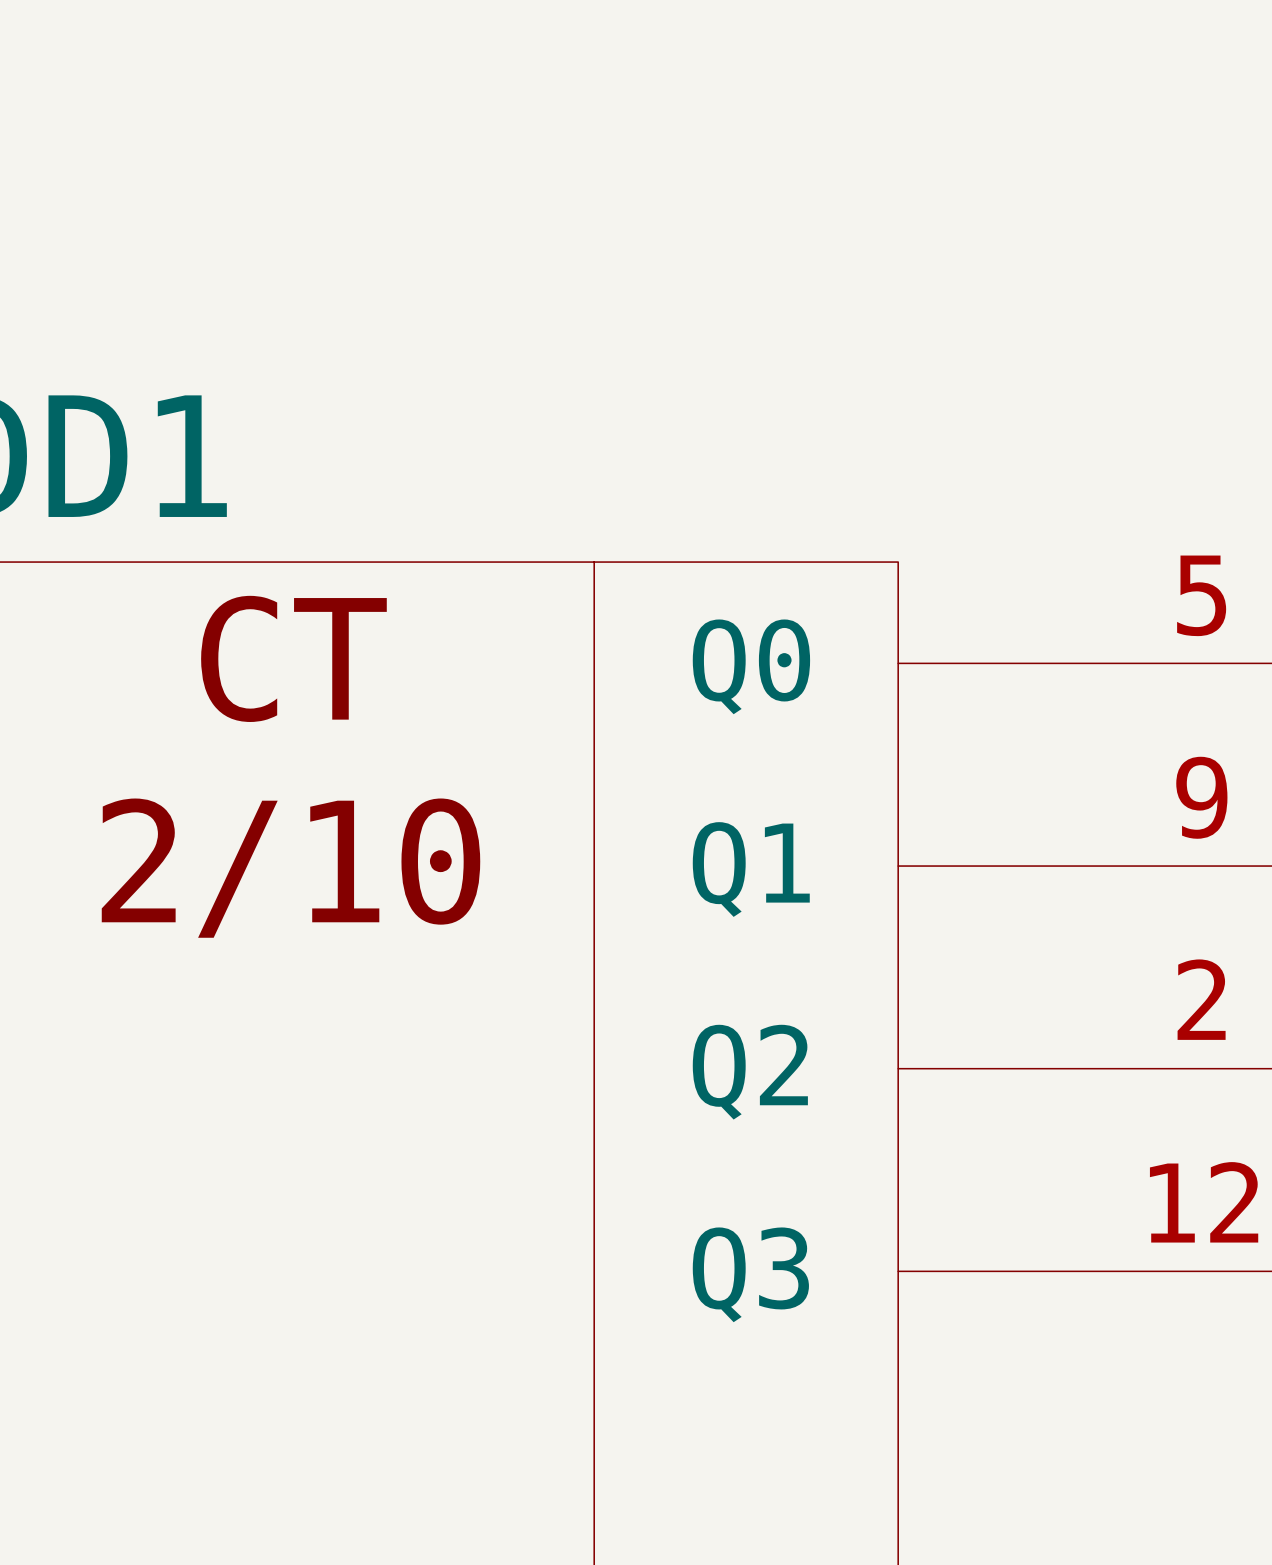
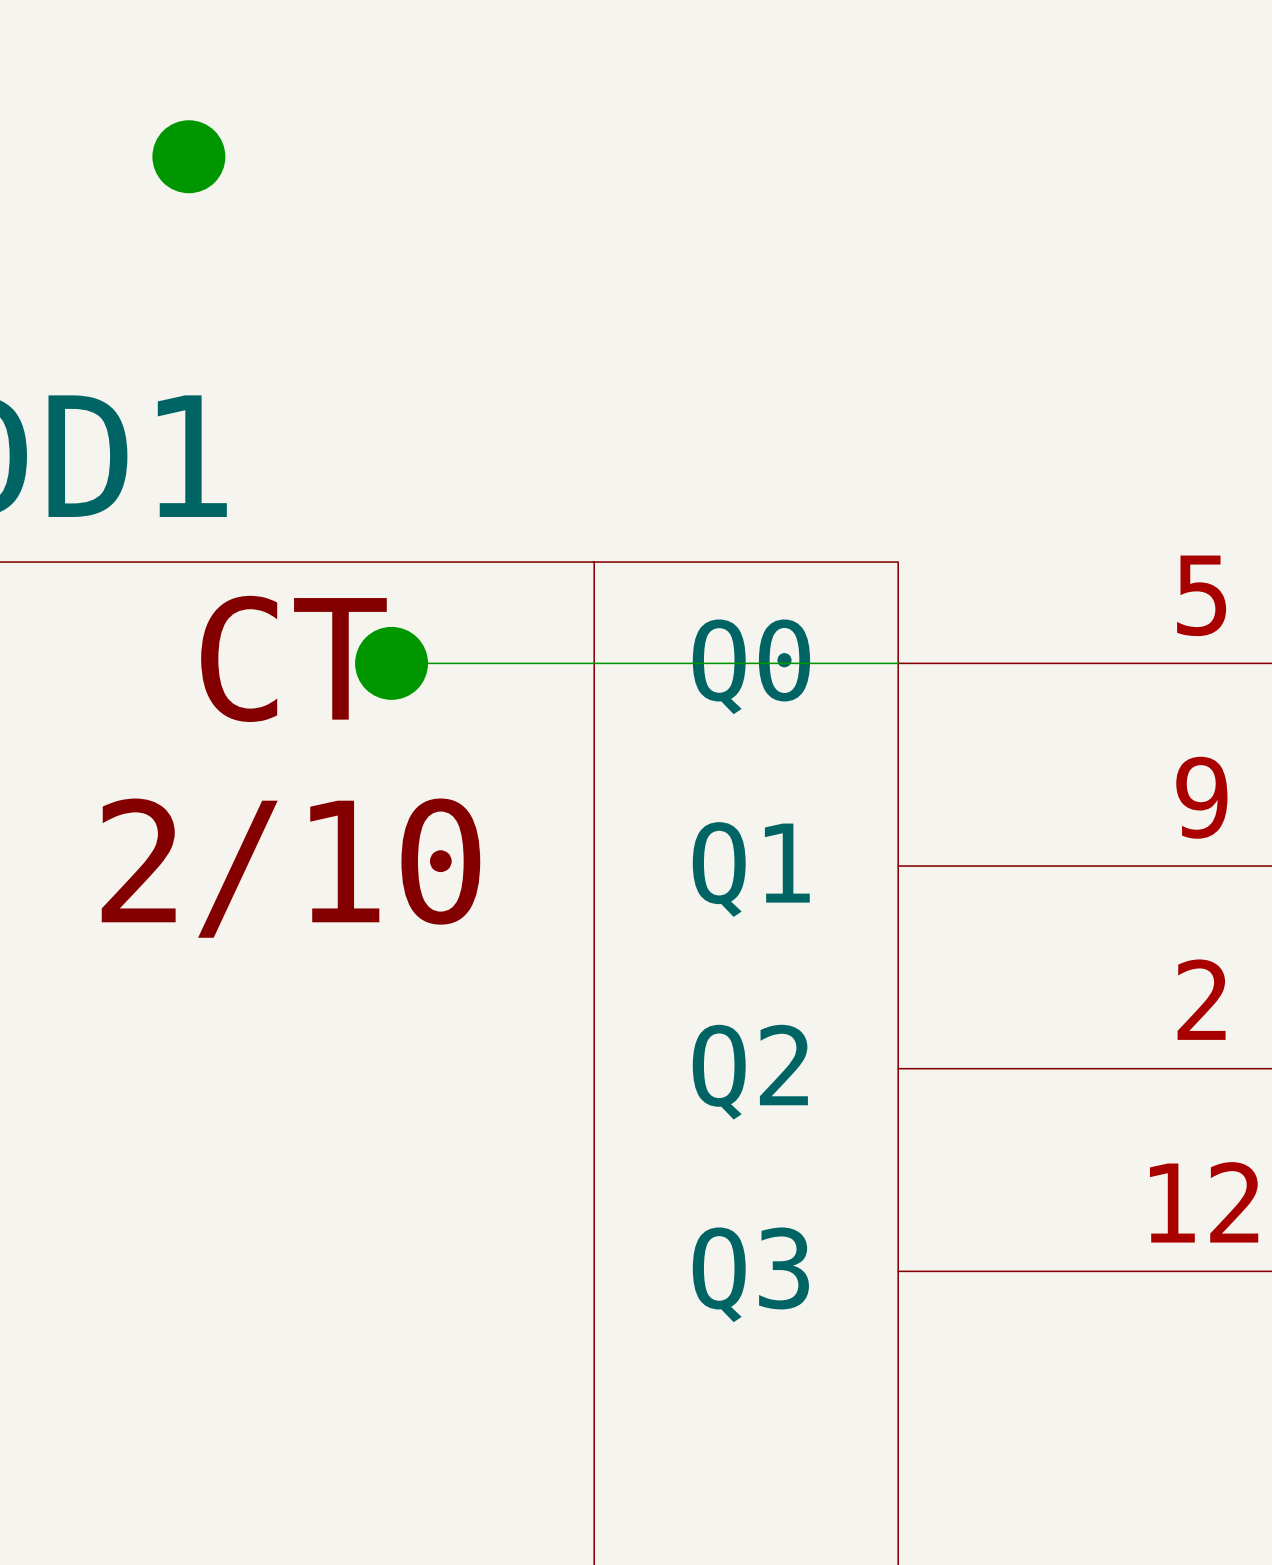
junction: none -> (188, 156)
wire: none -> (391, 663) (898, 663)
junction: none -> (391, 663)

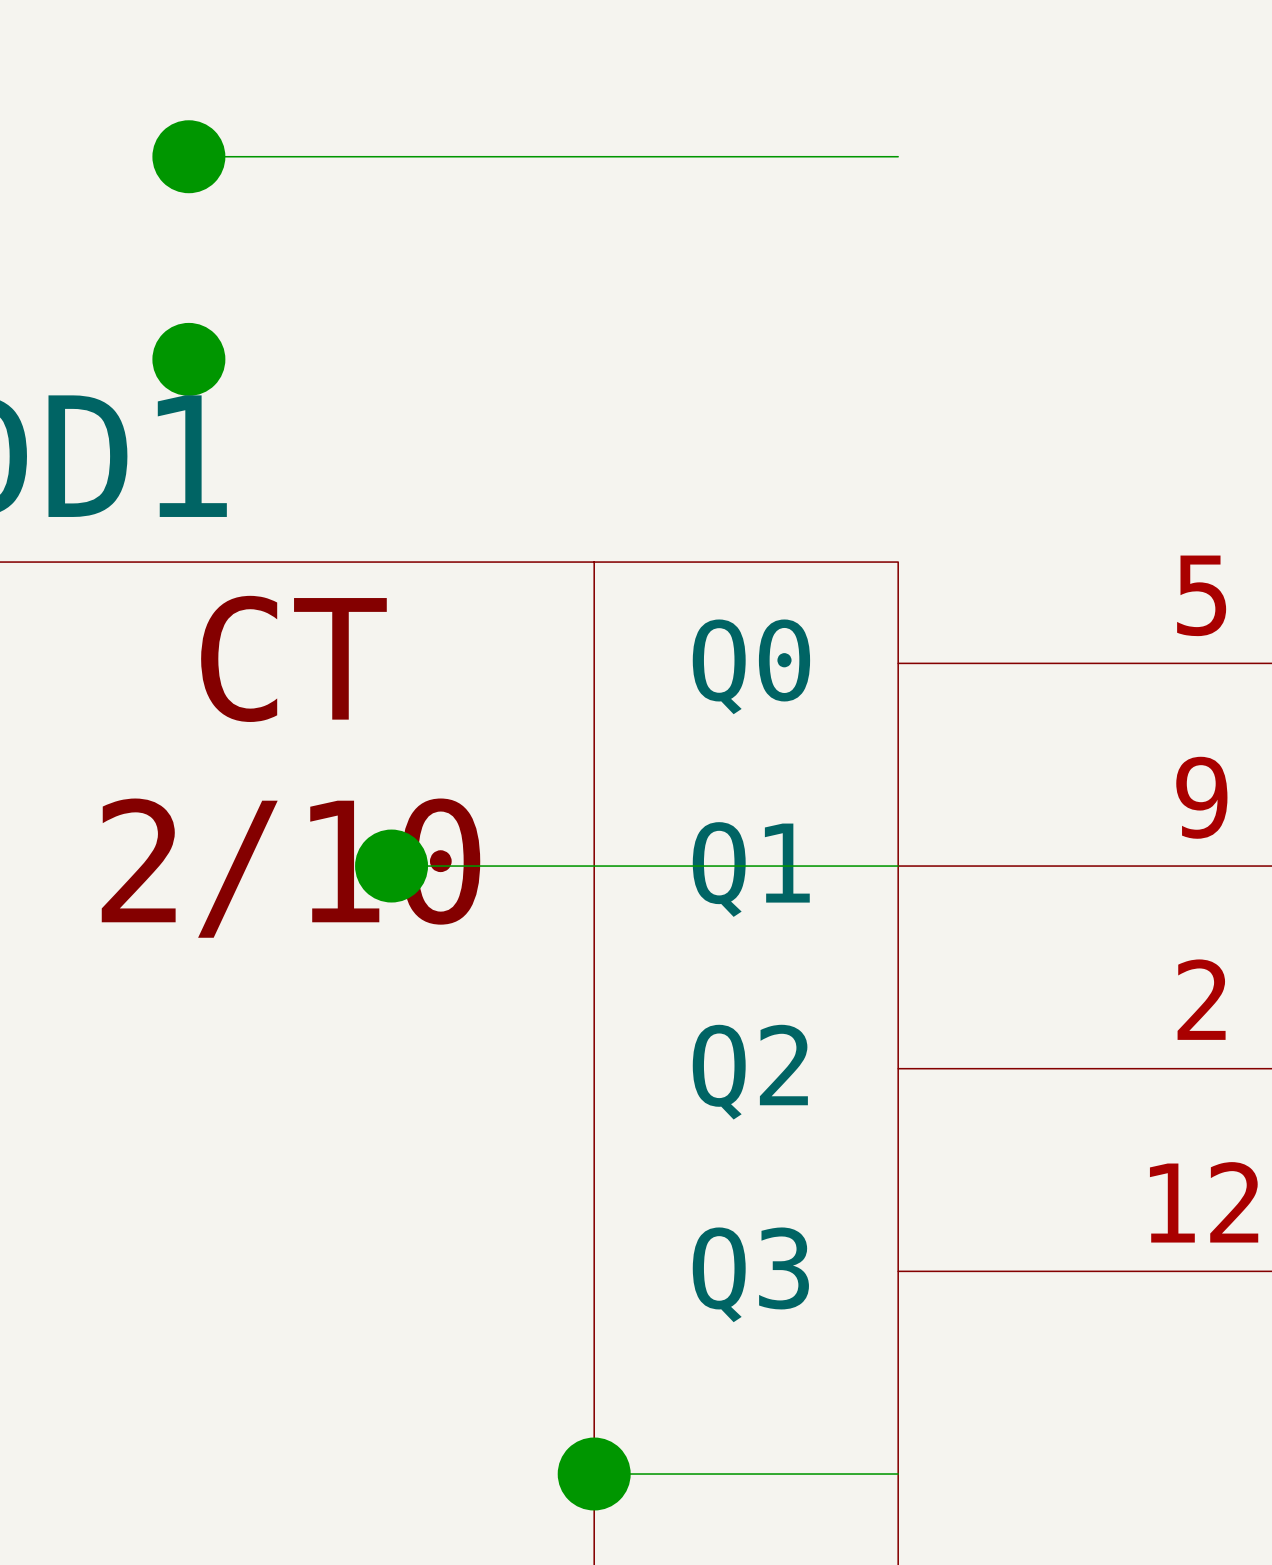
wire: none -> (188, 156) (898, 156)
junction: none -> (188, 359)
wire: (391, 663) (898, 663) -> (391, 866) (898, 866)
junction: (391, 663) -> none
junction: none -> (391, 866)
wire: none -> (594, 1474) (898, 1474)
junction: none -> (594, 1474)

